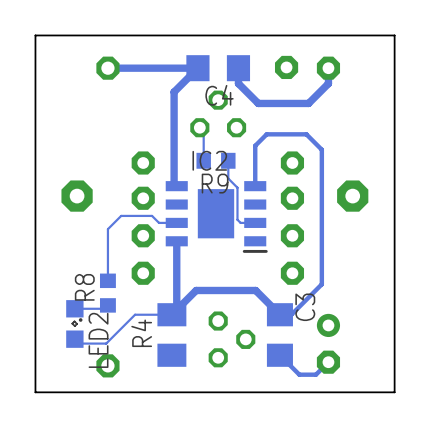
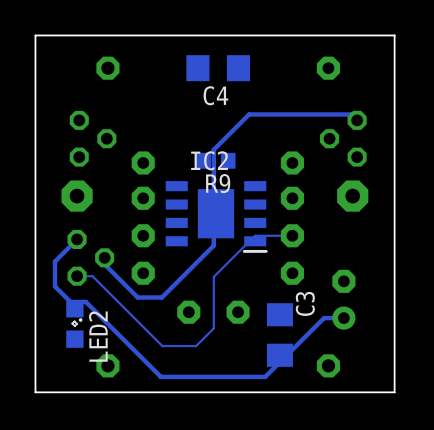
part: (286, 67) -> none
track: (107, 68) (197, 68) (174, 92) (174, 183) (176, 186) -> none
track: (328, 68) (328, 83) (308, 103) (258, 103) (238, 83) (238, 68) -> none
part: (218, 113) -> none
track: none -> (357, 120) (351, 114) (249, 114) (213, 149) (213, 245) (161, 297) (137, 297) (104, 264) (104, 257)
track: (199, 127) (203, 131) (203, 160) -> none
part: none -> (93, 138)
part: none -> (343, 138)
track: (228, 160) (228, 178) (237, 187) (237, 219) (240, 222) (255, 222) -> none
track: (255, 186) (255, 145) (266, 134) (306, 134) (321, 149) (321, 284) (291, 314) (279, 314) (255, 290) (196, 290) (171, 314) (135, 314) (106, 343) (79, 343) (74, 339) -> none
track: (176, 222) (159, 222) (152, 215) (121, 215) (107, 229) (107, 280) -> none
track: none -> (292, 235) (254, 235) (213, 276) (213, 328) (196, 346) (162, 346) (92, 276) (77, 276)
track: none -> (77, 239) (55, 261) (55, 286) (70, 301) (85, 301) (160, 376) (265, 376) (324, 318) (343, 318)
track: (176, 241) (176, 309) -> none
part: none -> (90, 257)
R8: (107, 293) -> none
track: (107, 305) (104, 308) (74, 308) -> none
part: none -> (188, 312)
part: none -> (238, 312)
R4: (171, 335) -> none
part: (231, 339) -> none
part rotation: 0° (328, 343) -> 180° (343, 299)
part position: (328, 343) -> (343, 299)
track: (279, 355) (299, 374) (315, 374) (328, 362) -> none
part: none -> (328, 365)

